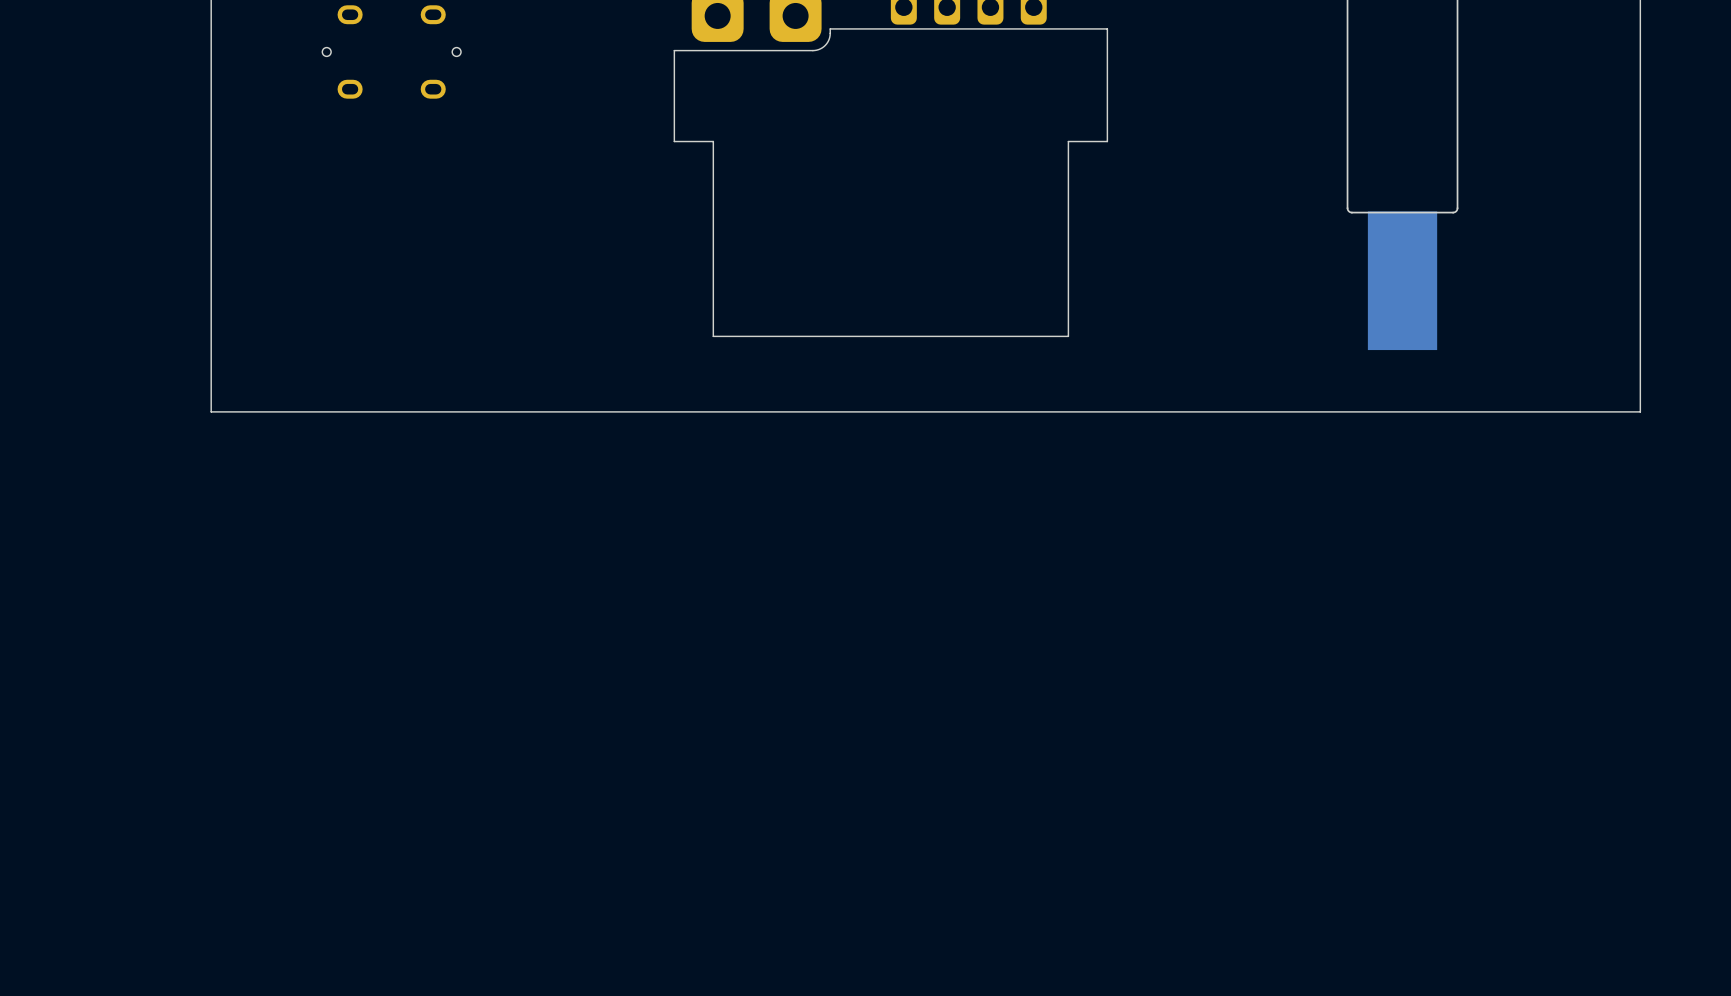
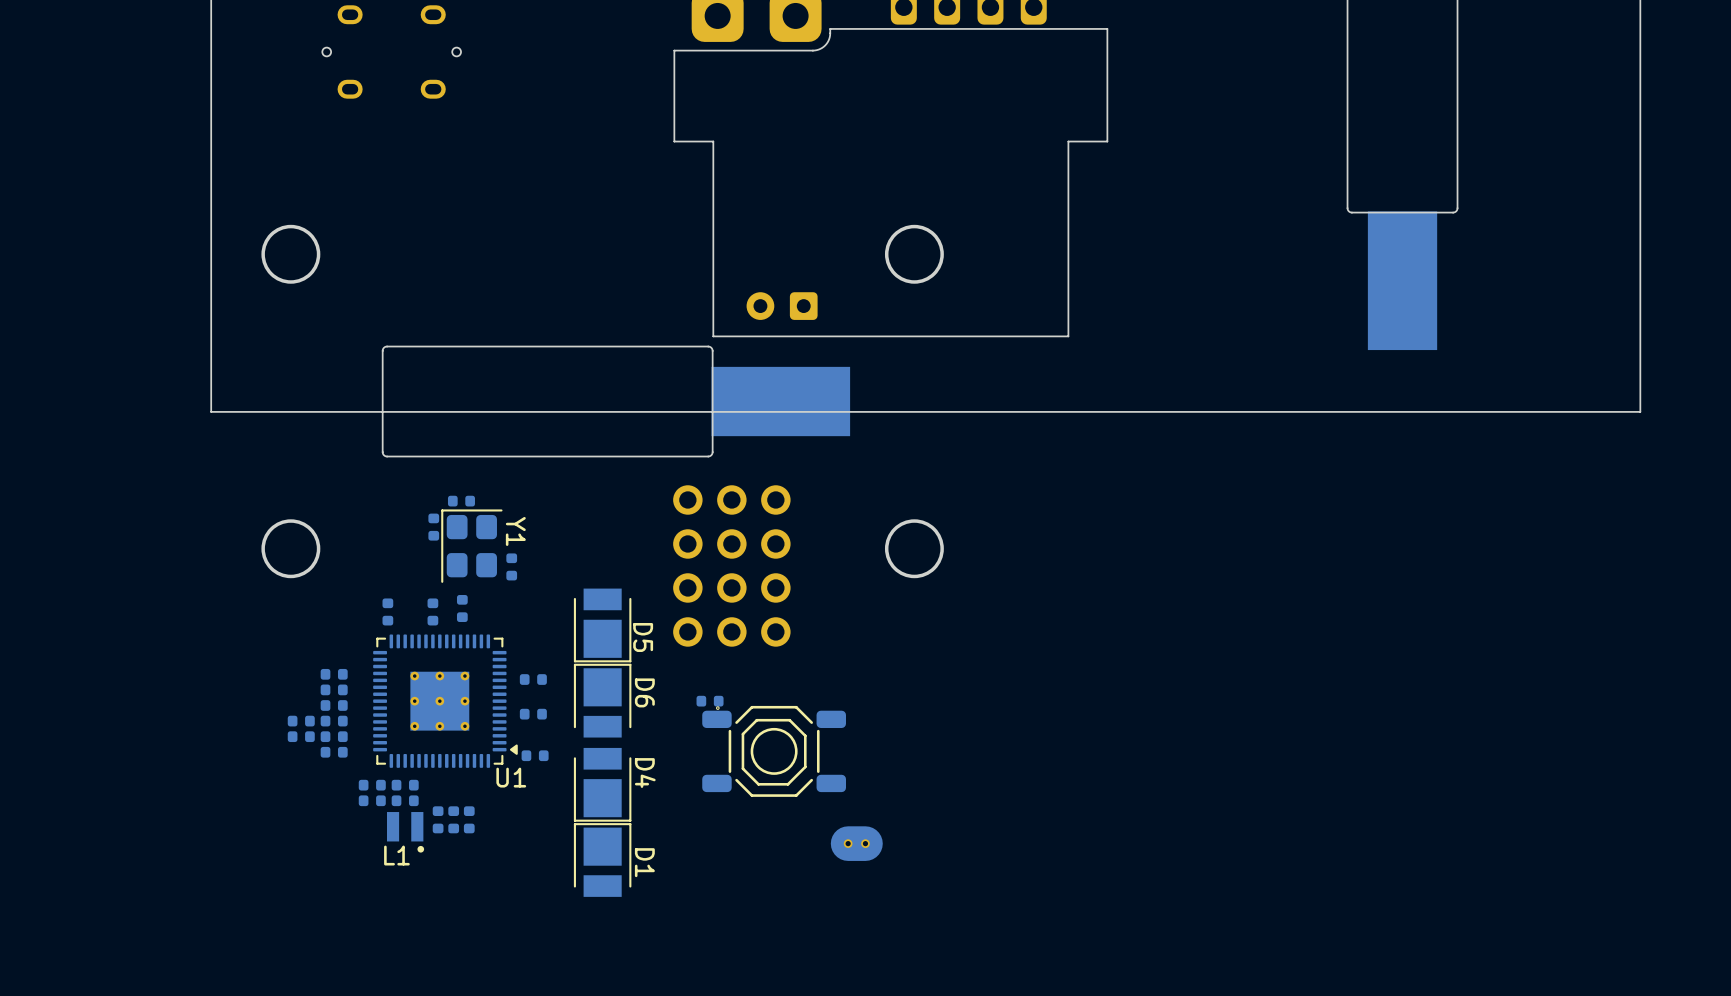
round board edge: none -> [261, 224, 321, 284]
round board edge: none -> [884, 224, 944, 284]
part: none -> (782, 306)
part: none -> (615, 401)
part: none -> (461, 501)
round board edge: none -> [261, 519, 321, 579]
round board edge: none -> [884, 519, 944, 579]
part: none -> (433, 527)
Y1: none -> (471, 546)
part: none -> (731, 565)
part: none -> (511, 566)
part: none -> (462, 608)
part: none -> (387, 611)
part: none -> (432, 611)
D5: none -> (602, 625)
part: none -> (334, 674)
part: none -> (533, 679)
part: none -> (334, 689)
D6: none -> (602, 700)
U1: none -> (445, 701)
part: none -> (710, 701)
part: none -> (334, 705)
part: none -> (533, 714)
part: none -> (301, 721)
part: none -> (334, 721)
part: none -> (301, 736)
part: none -> (334, 736)
part: none -> (774, 751)
part: none -> (334, 752)
part: none -> (535, 755)
D4: none -> (602, 784)
part: none -> (372, 785)
part: none -> (405, 785)
part: none -> (372, 800)
part: none -> (405, 800)
part: none -> (438, 819)
part: none -> (453, 819)
part: none -> (469, 819)
L1: none -> (405, 832)
part: none -> (856, 843)
D1: none -> (602, 859)

